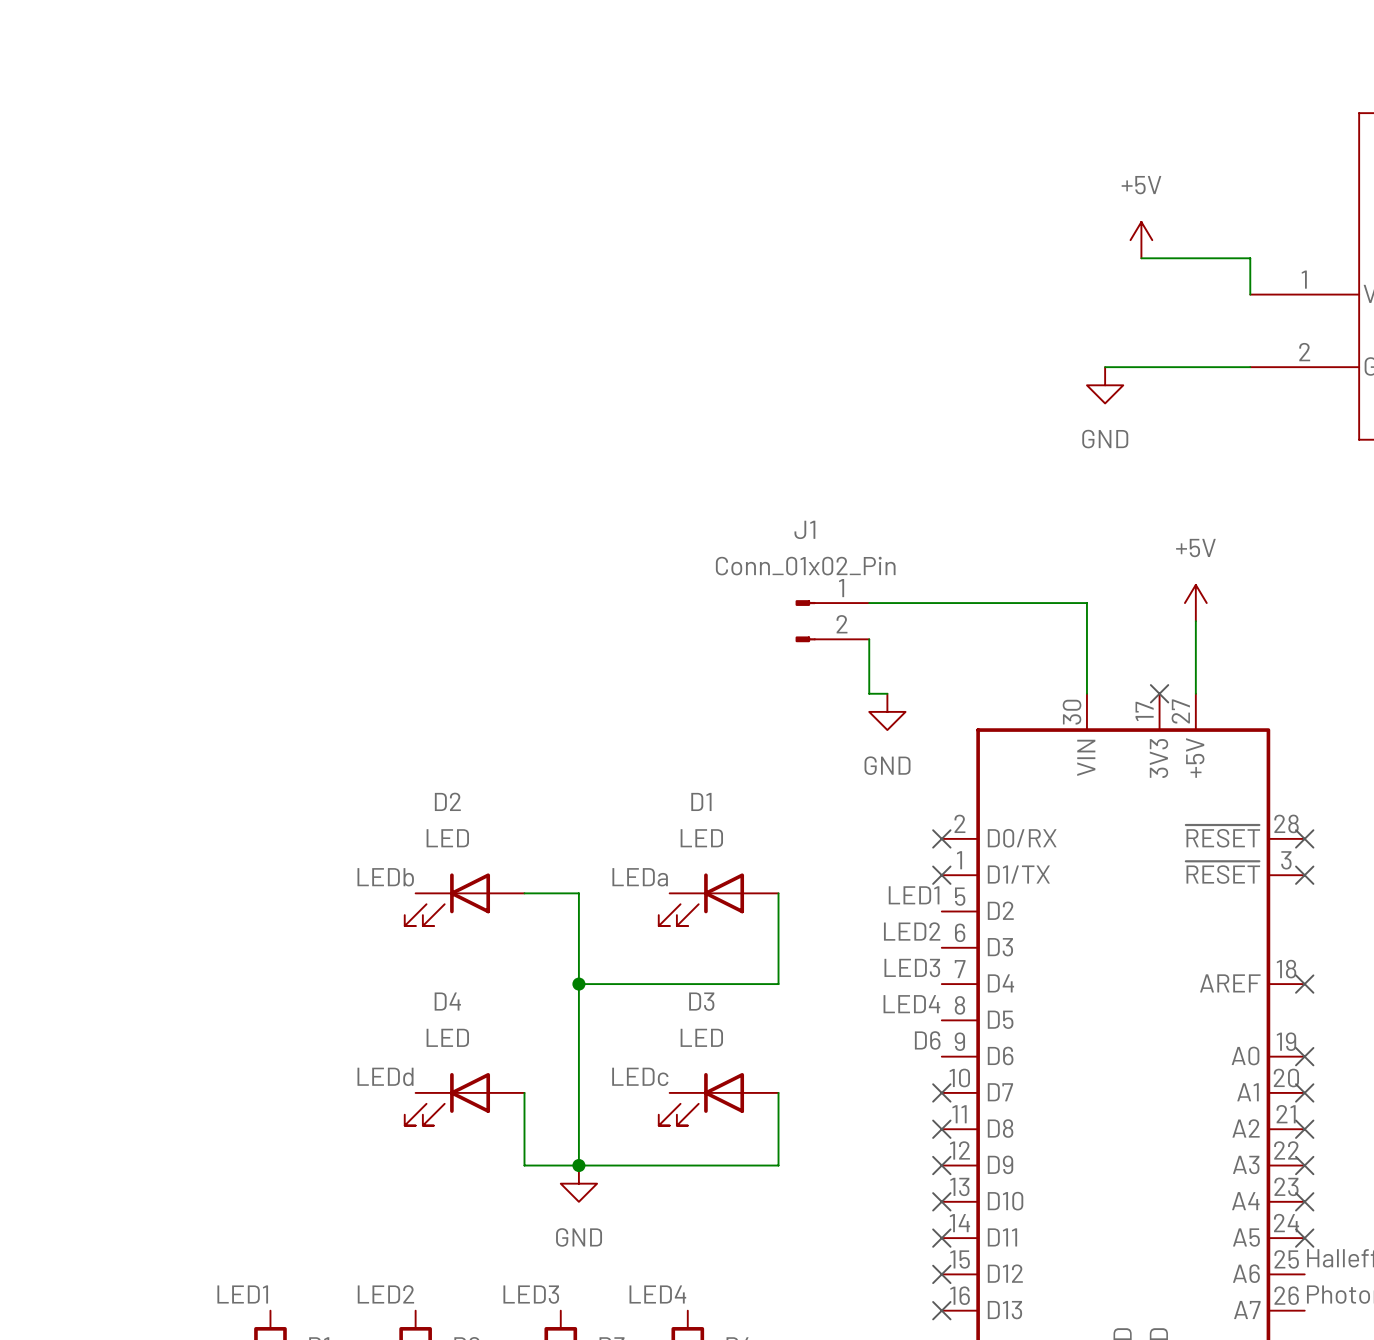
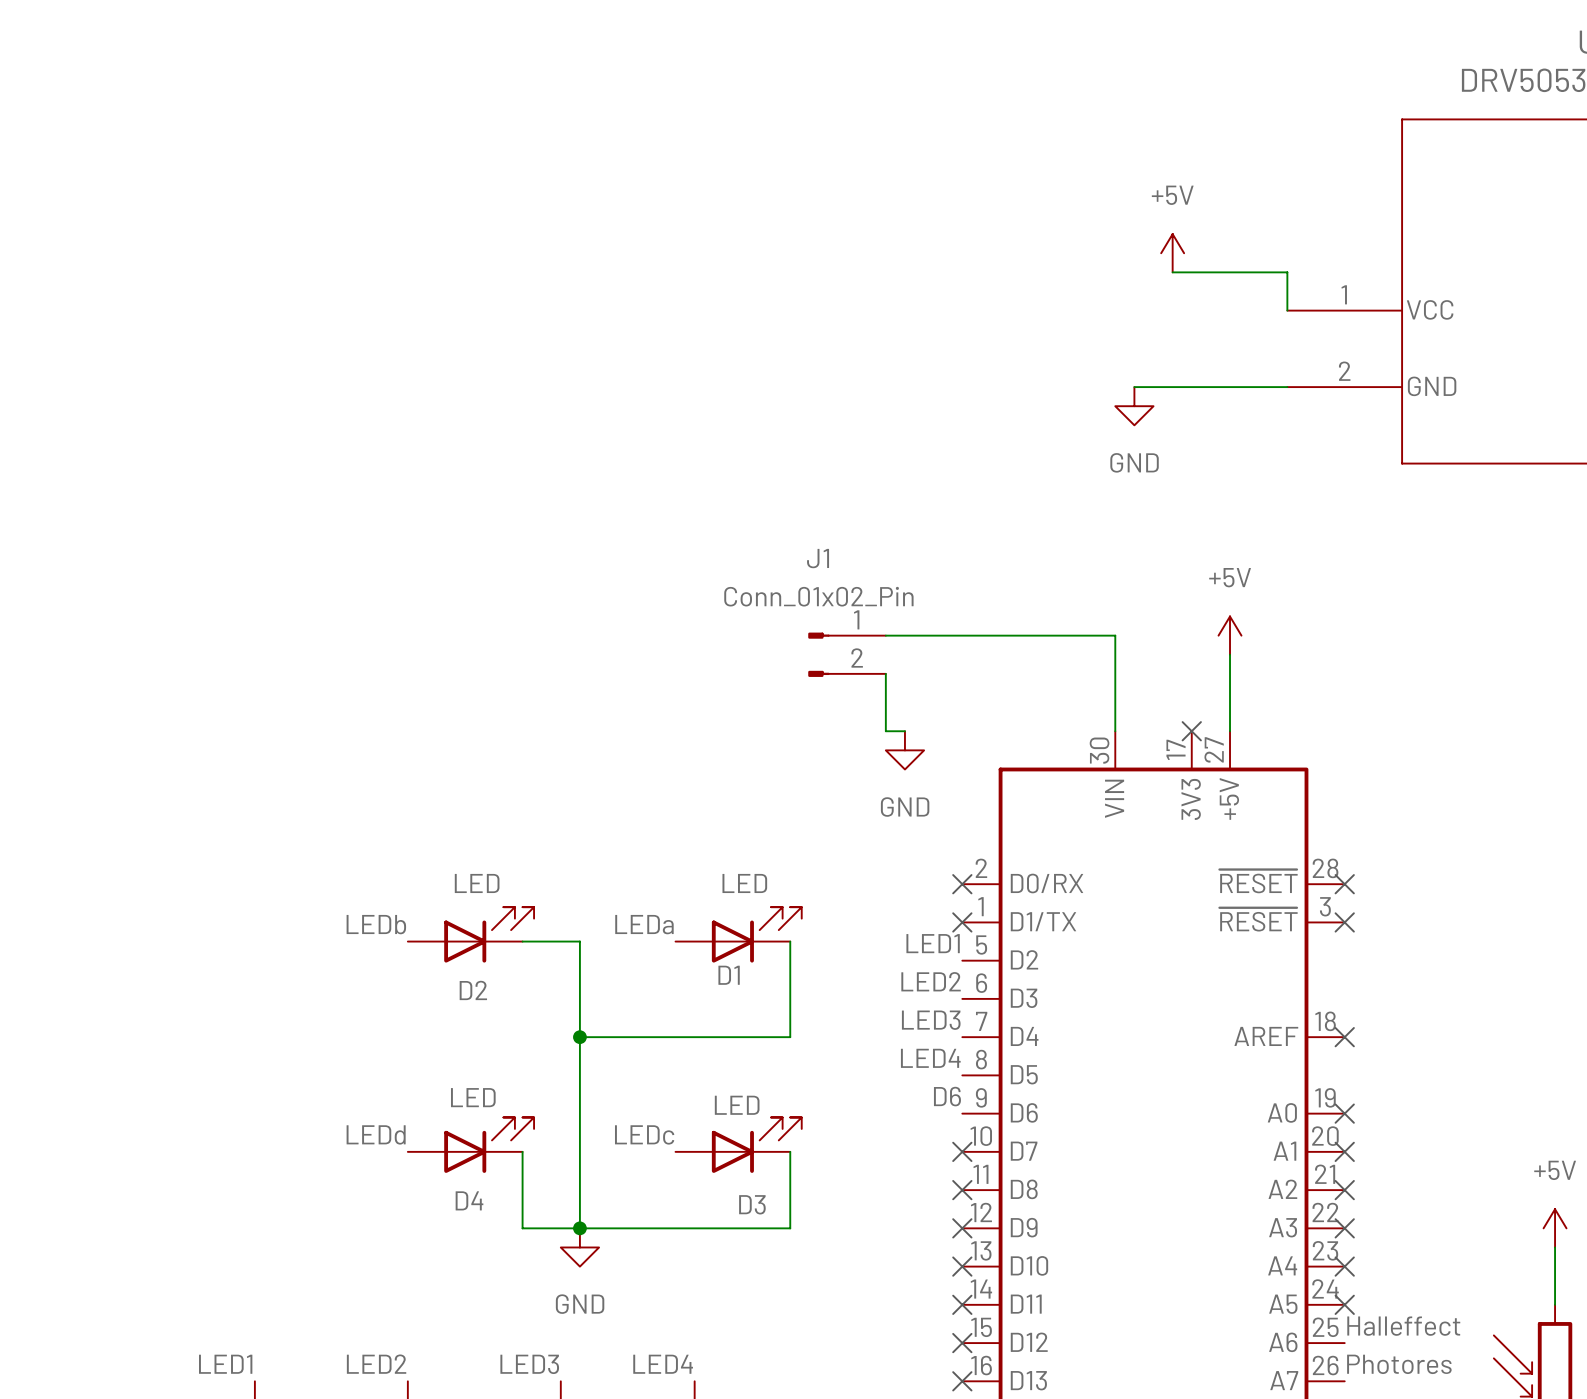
D2 name position: D2 (447, 801) -> D2 (473, 990)
D1 name position: D1 (701, 801) -> D1 (729, 975)
D2 rotation: 0° (447, 899) -> 180° (489, 934)
D1 rotation: 0° (701, 899) -> 180° (756, 934)
D4 name position: D4 (447, 1001) -> D4 (469, 1200)
D3 name position: D3 (701, 1001) -> D3 (752, 1204)
D4 rotation: 0° (447, 1099) -> 180° (489, 1145)
D3 rotation: 0° (701, 1099) -> 180° (756, 1145)

